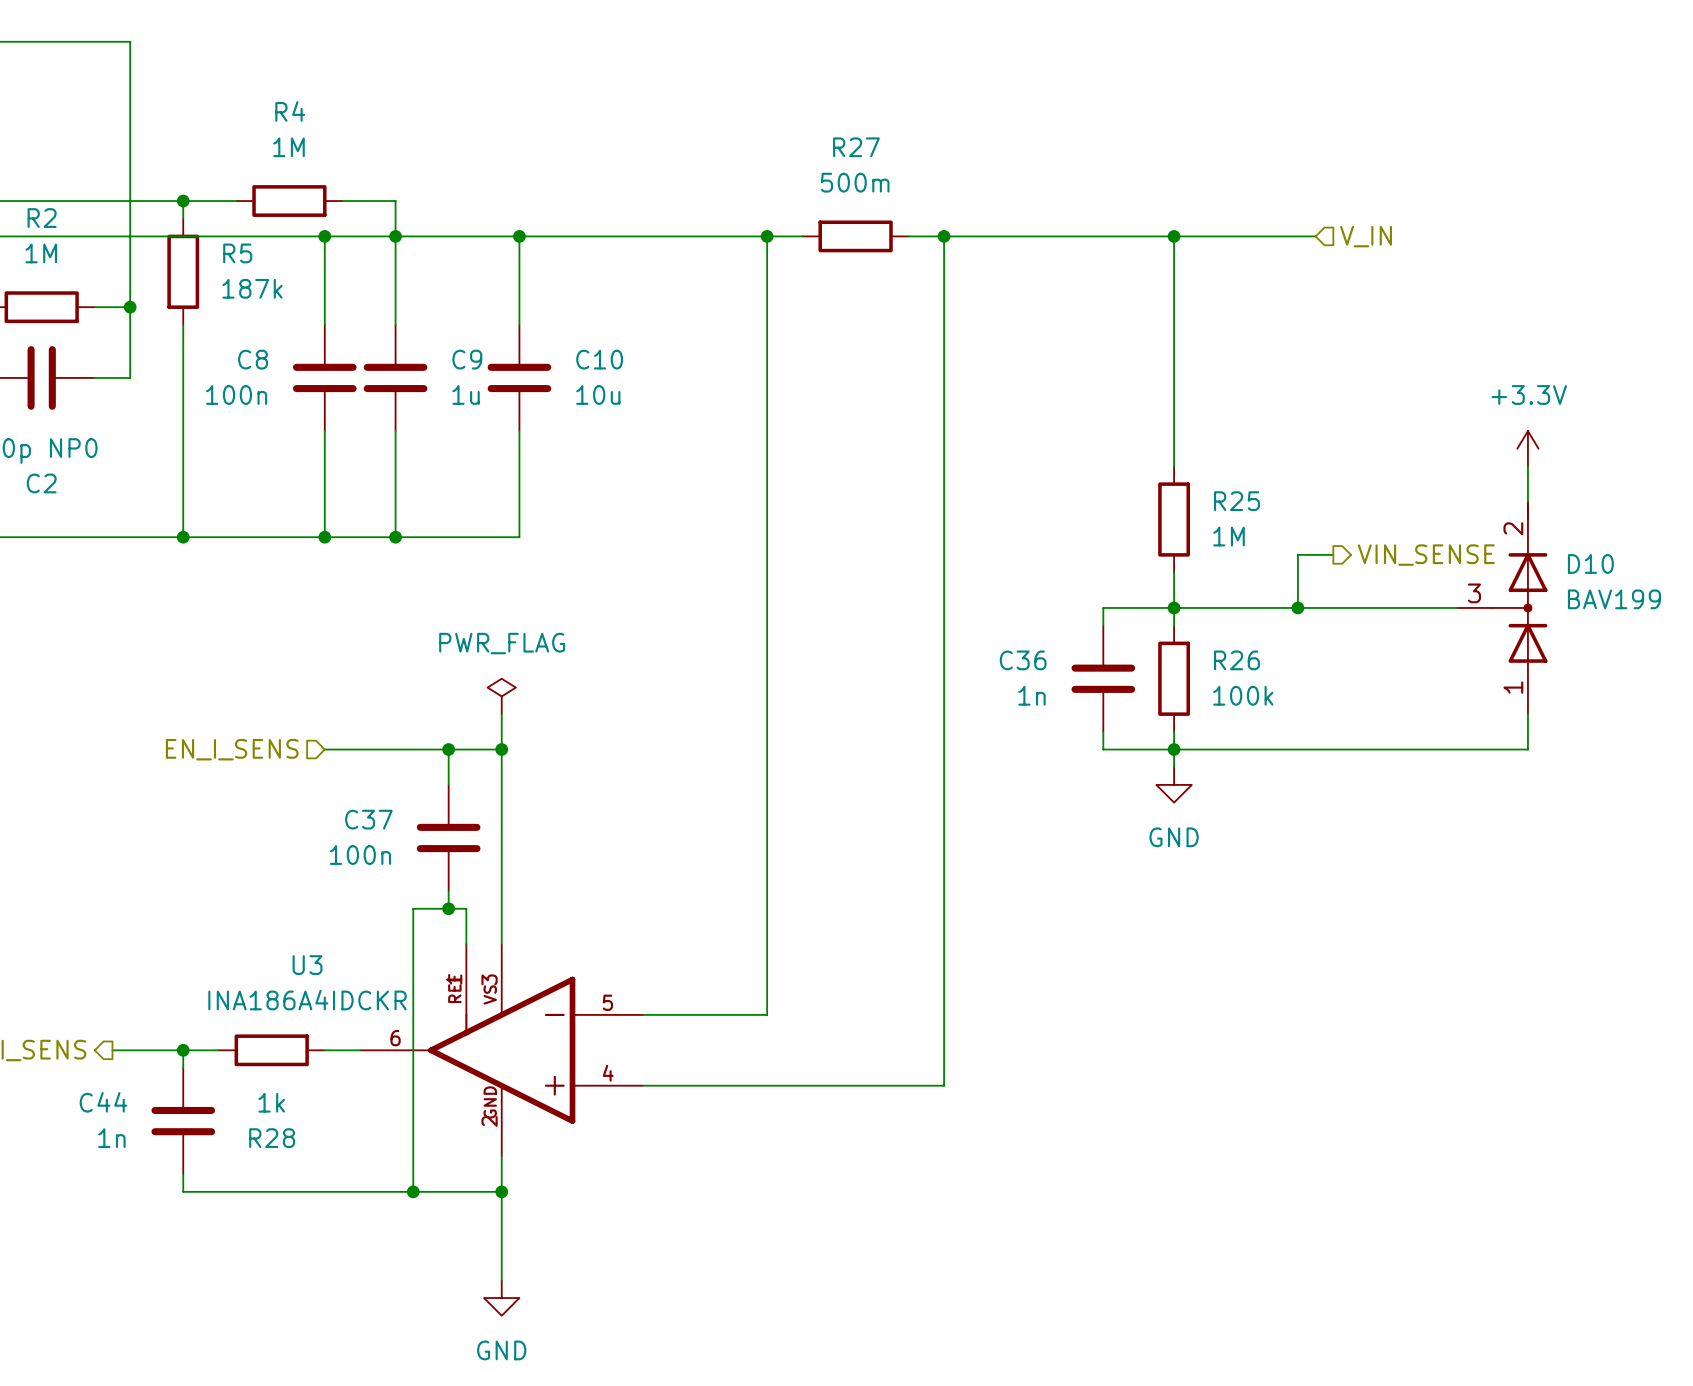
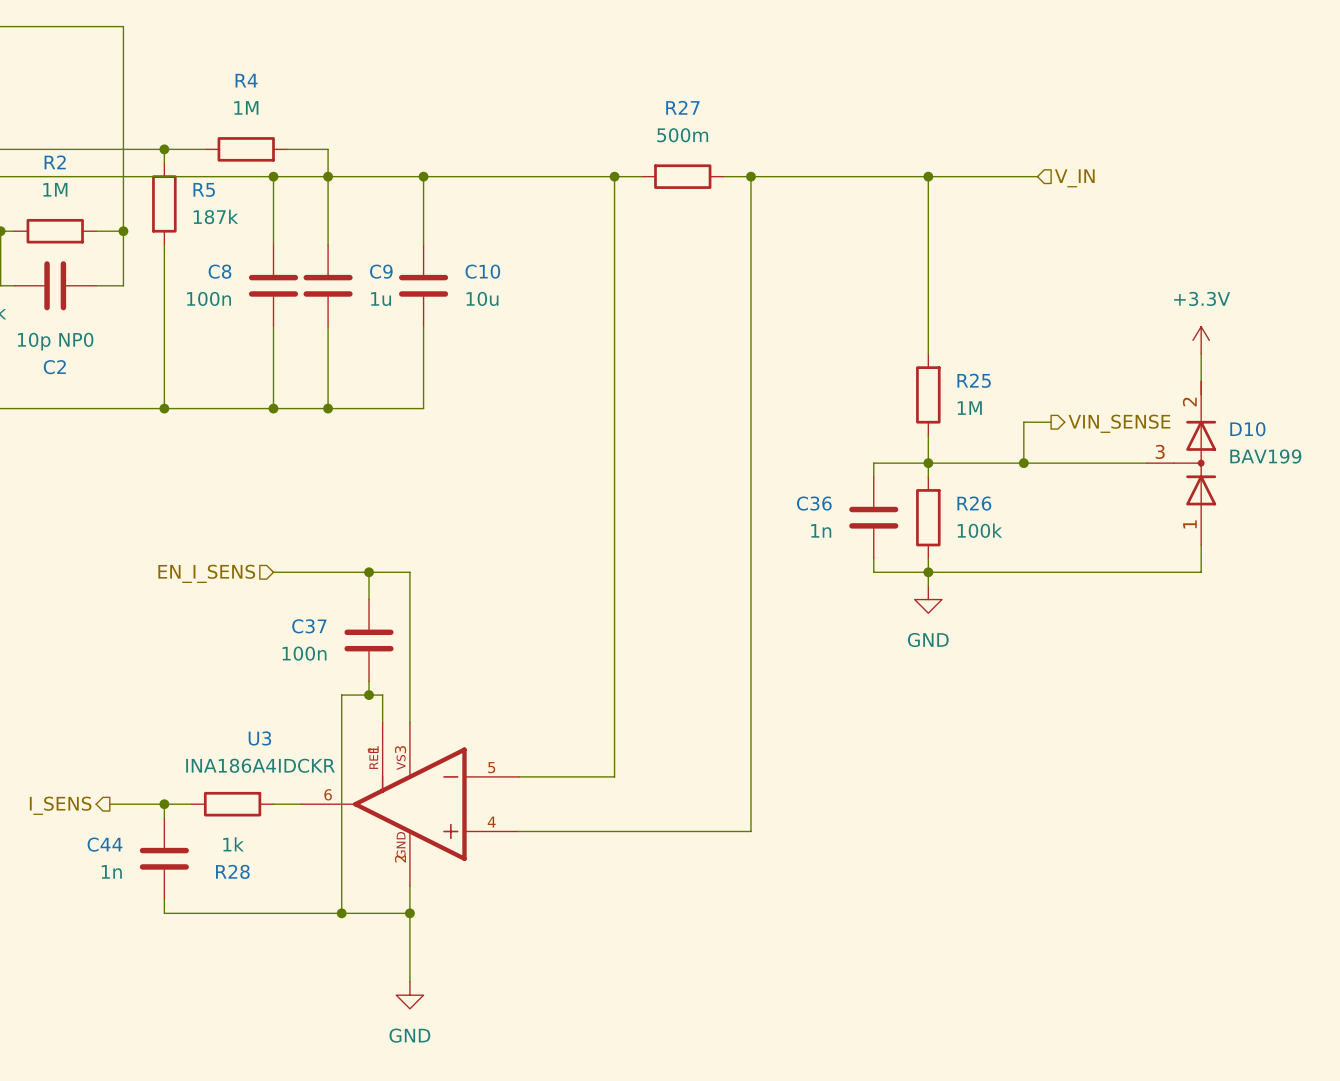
power symbol: PWR_FLAG (501, 696) -> none
wire: (501, 714) (501, 749) -> none
junction: (501, 749) -> none

